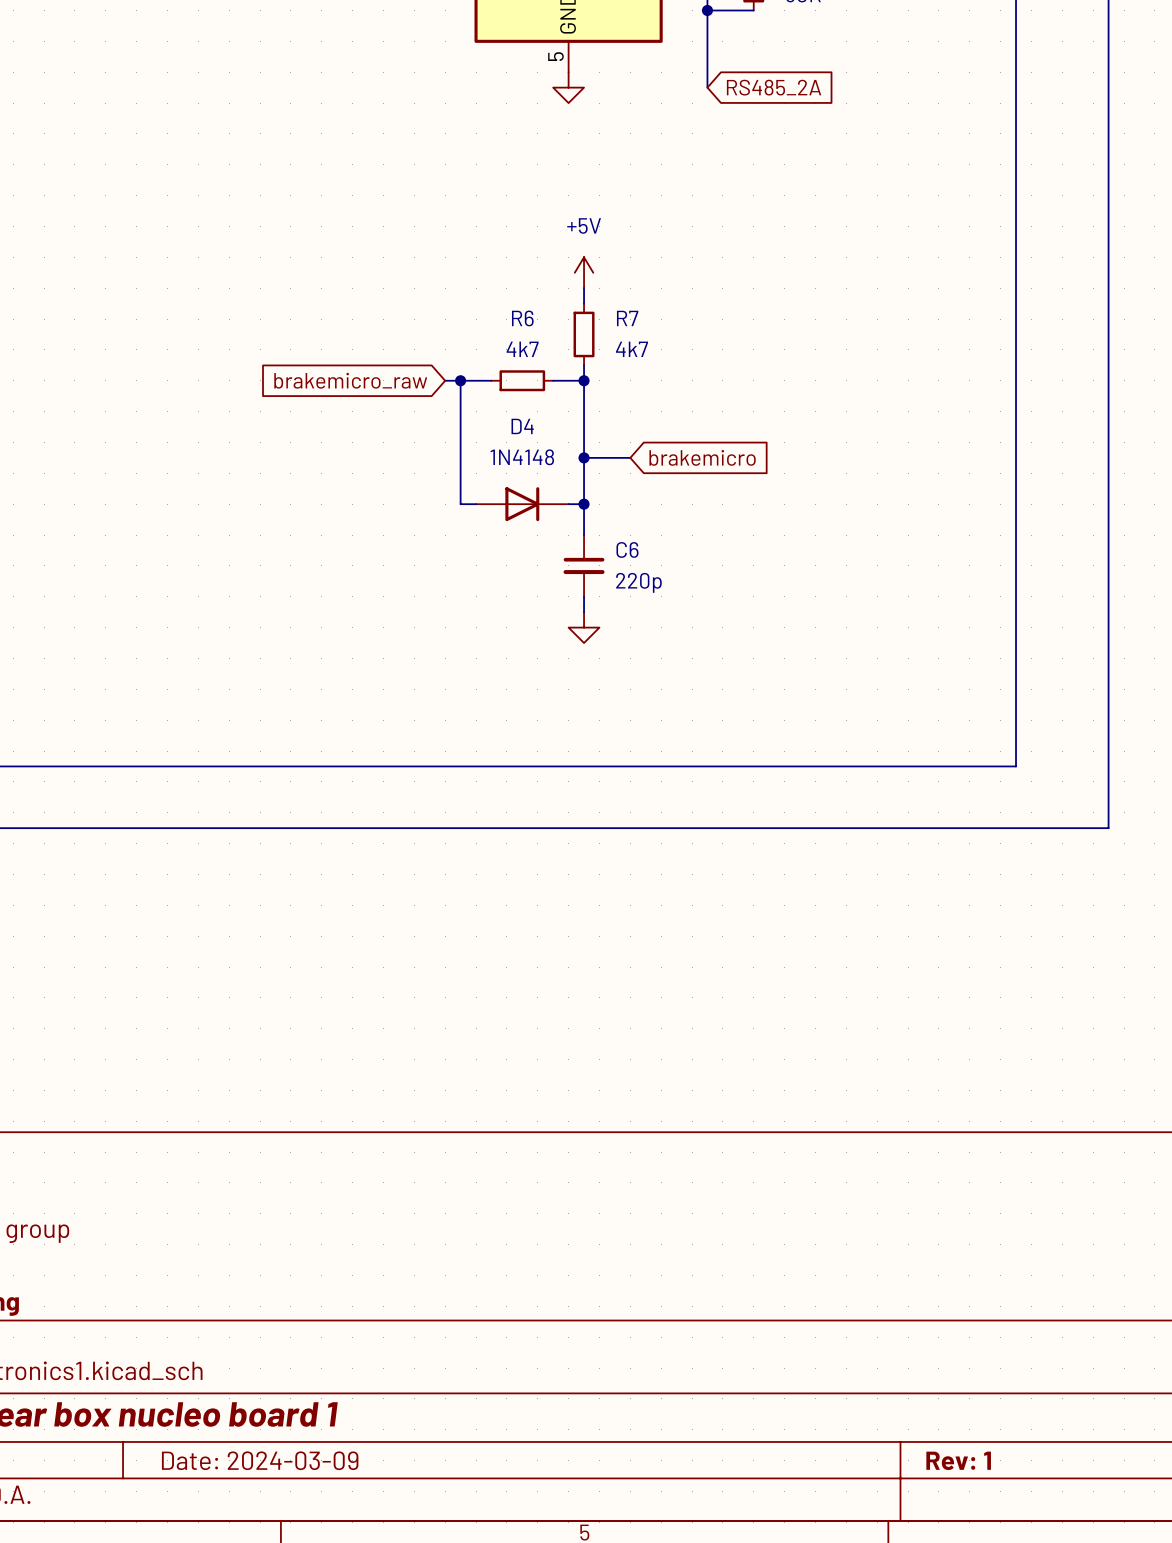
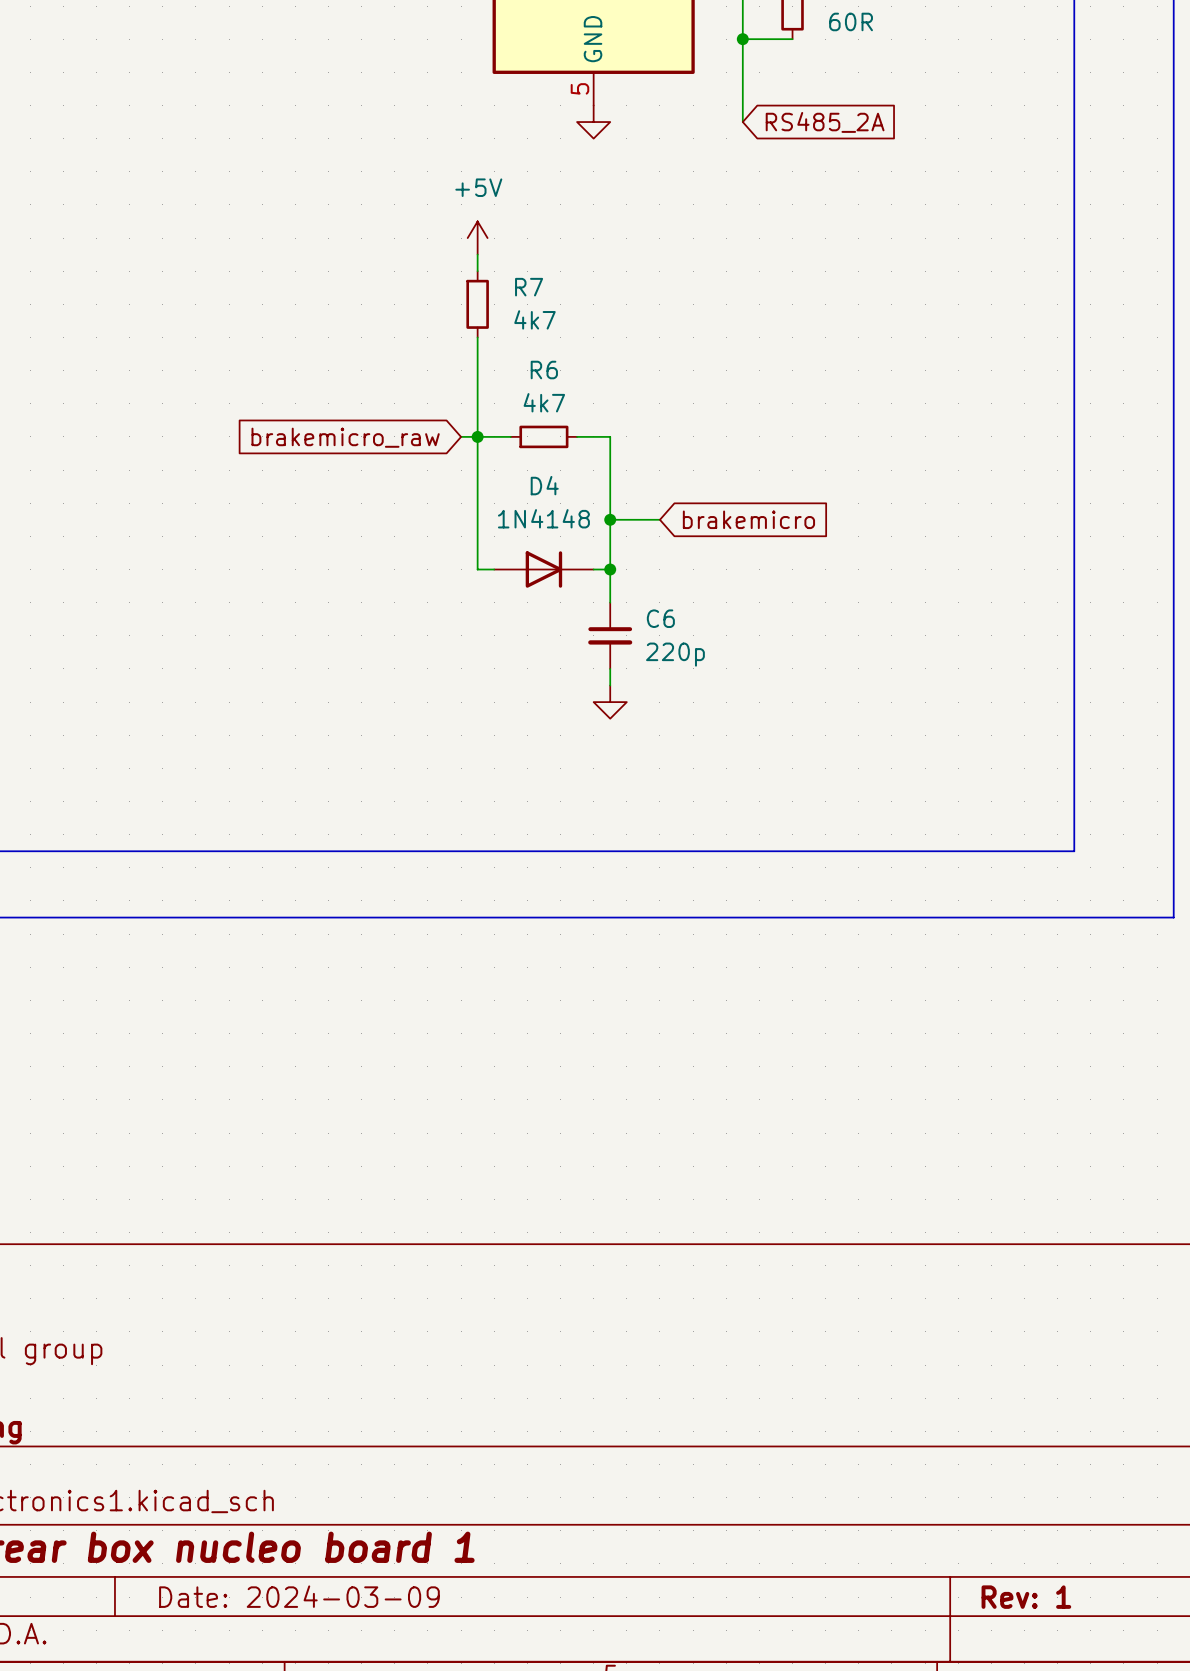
power symbol position: +5V (584, 272) -> +5V (477, 238)
wire: none -> (477, 337) (477, 436)
wire: (584, 288) (584, 303) -> (477, 254) (477, 271)
R7 position: (584, 334) -> (477, 304)
wire: (584, 365) (584, 380) -> none
junction: (584, 380) -> none

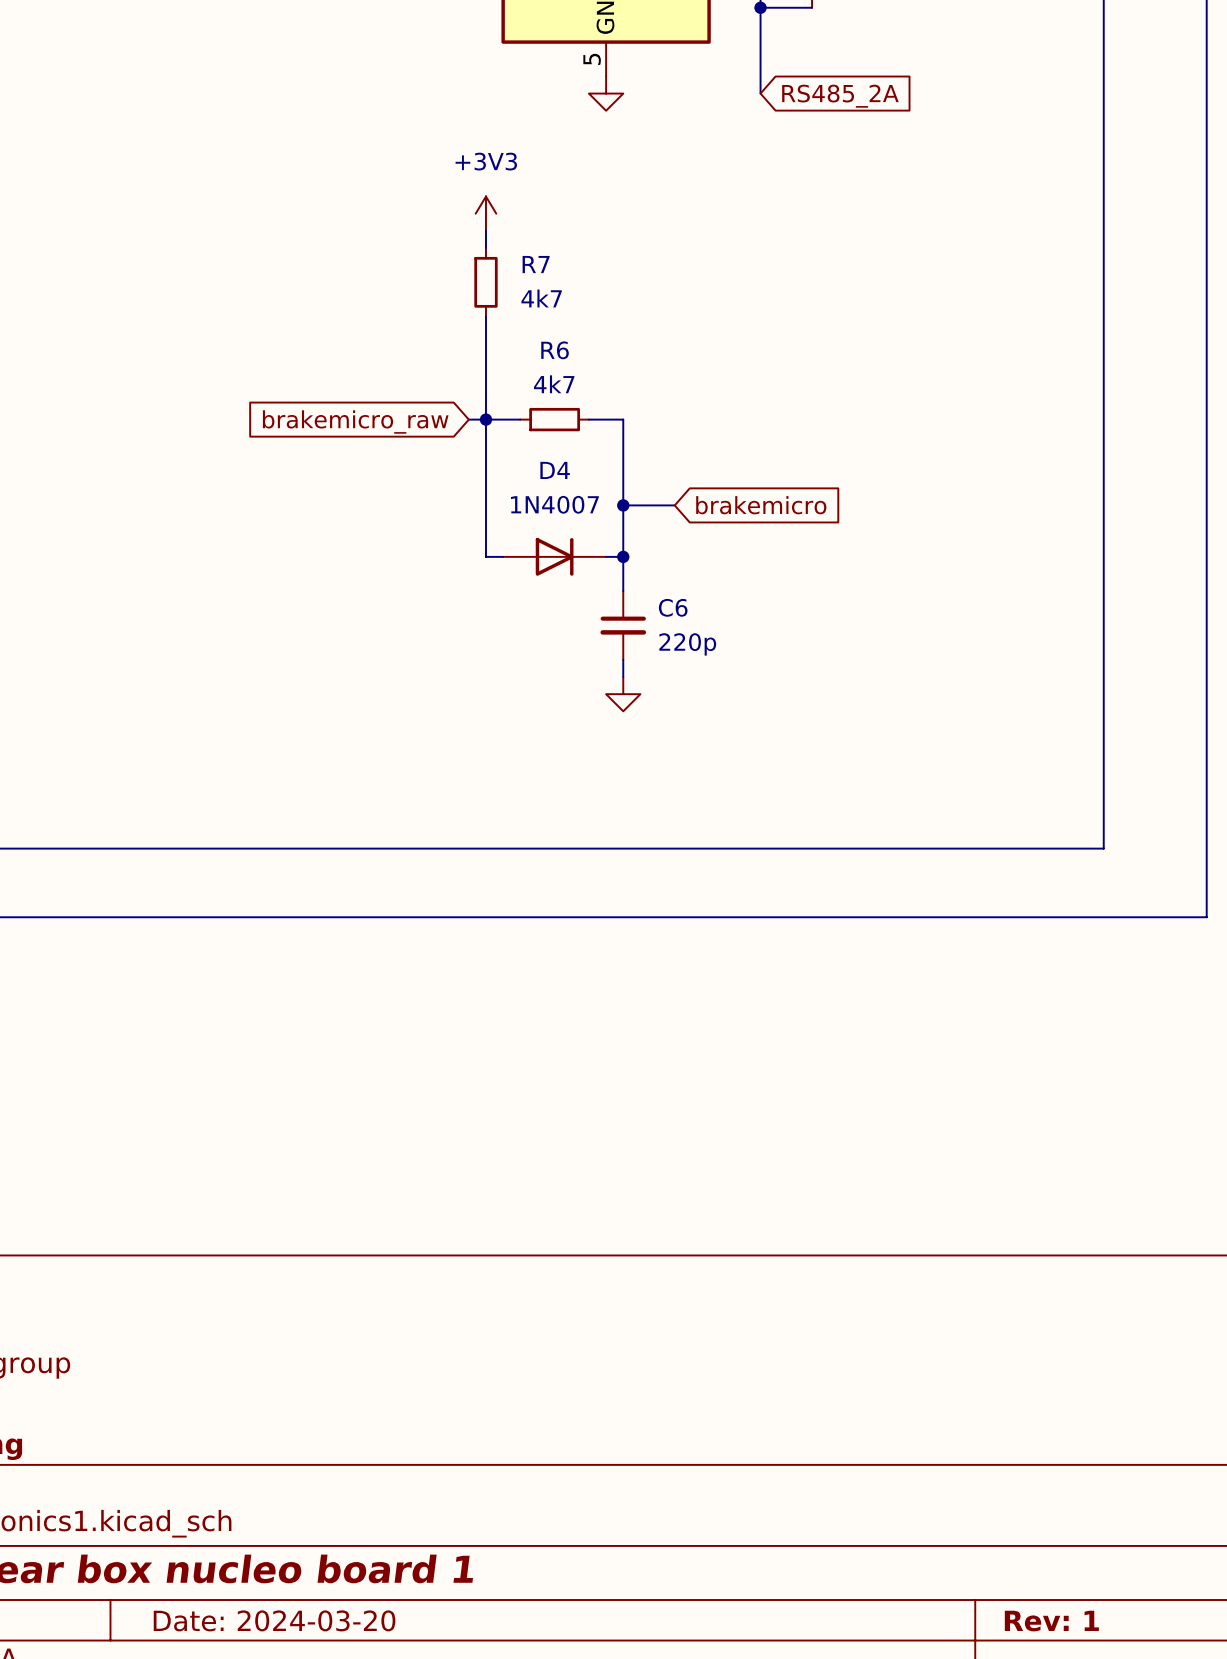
power symbol: +5V (477, 238) -> +3V3 (485, 213)
D4 value: 1N4148 (543, 518) -> 1N4007 (554, 504)
title block: Date: 2024-03-09 (299, 1596) -> Date: 2024-03-20 (274, 1620)

